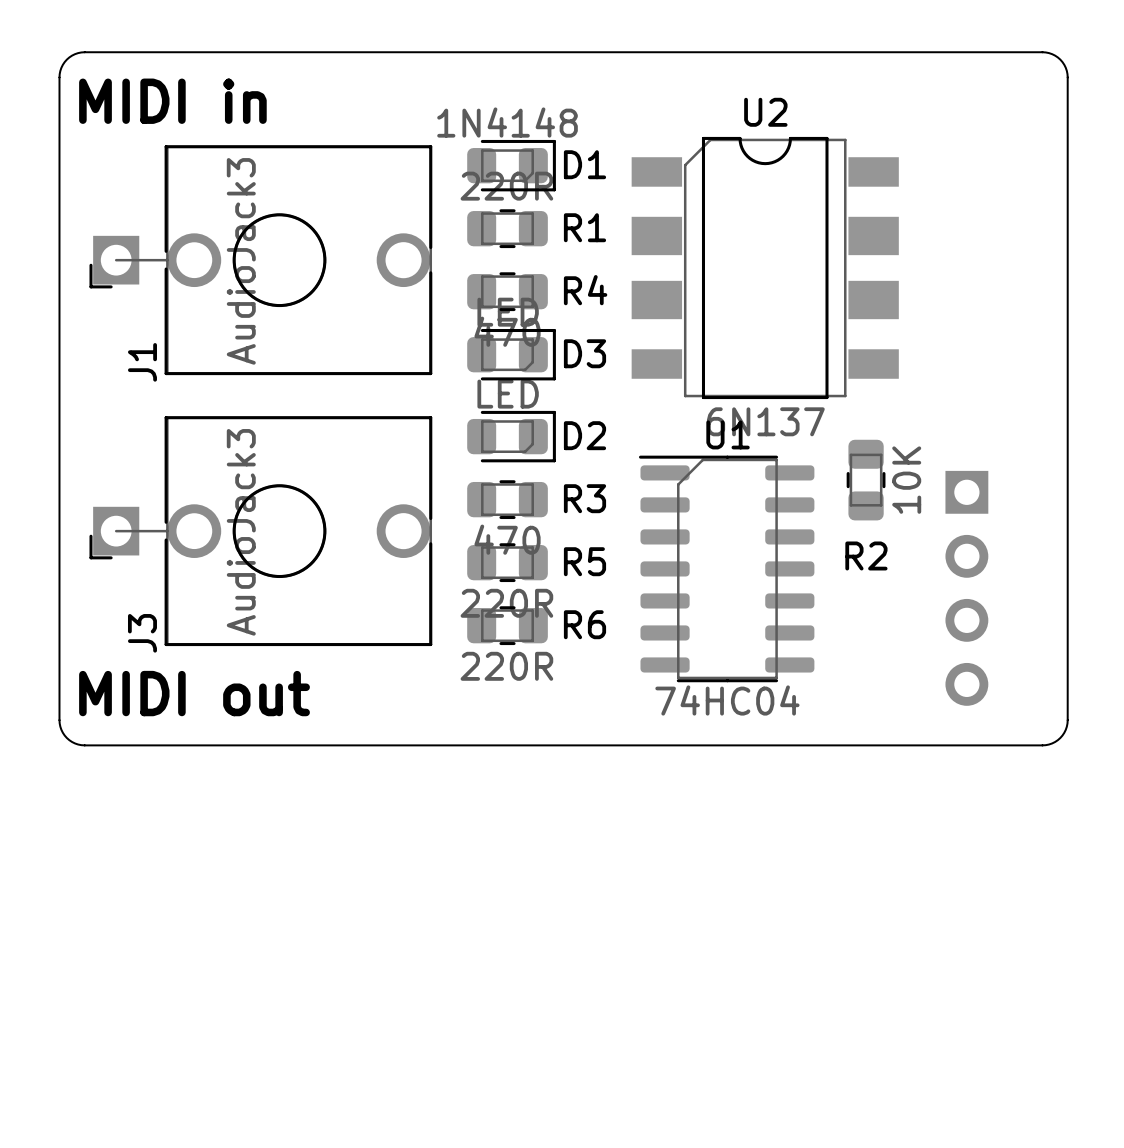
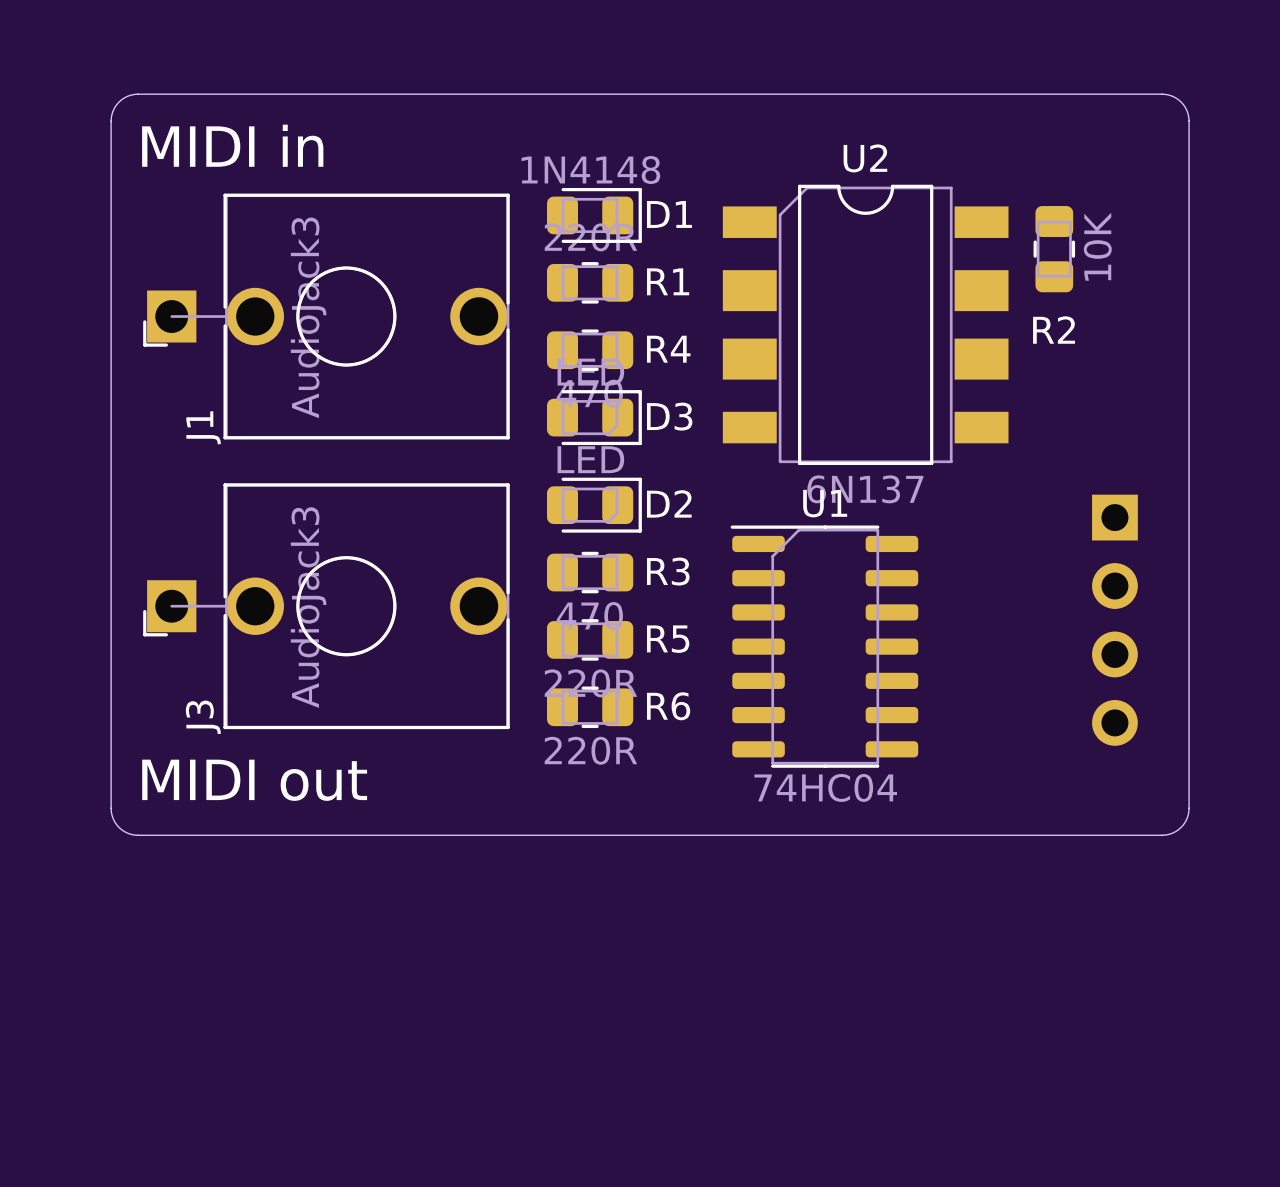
R2 position: (866, 480) -> (1054, 249)
part position: (966, 588) -> (1114, 620)

